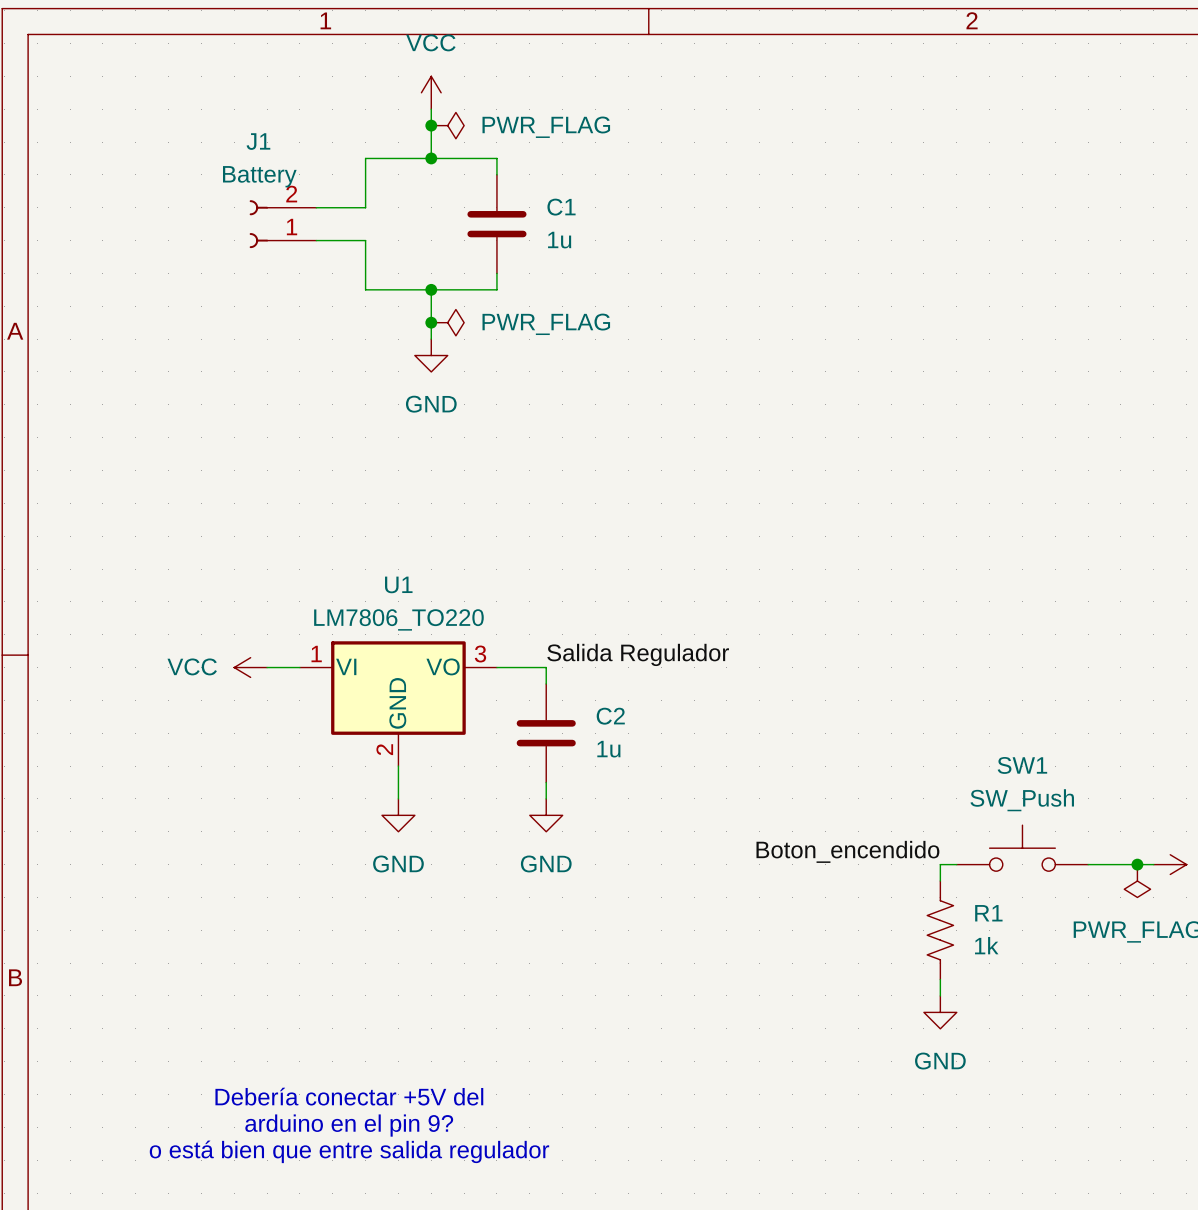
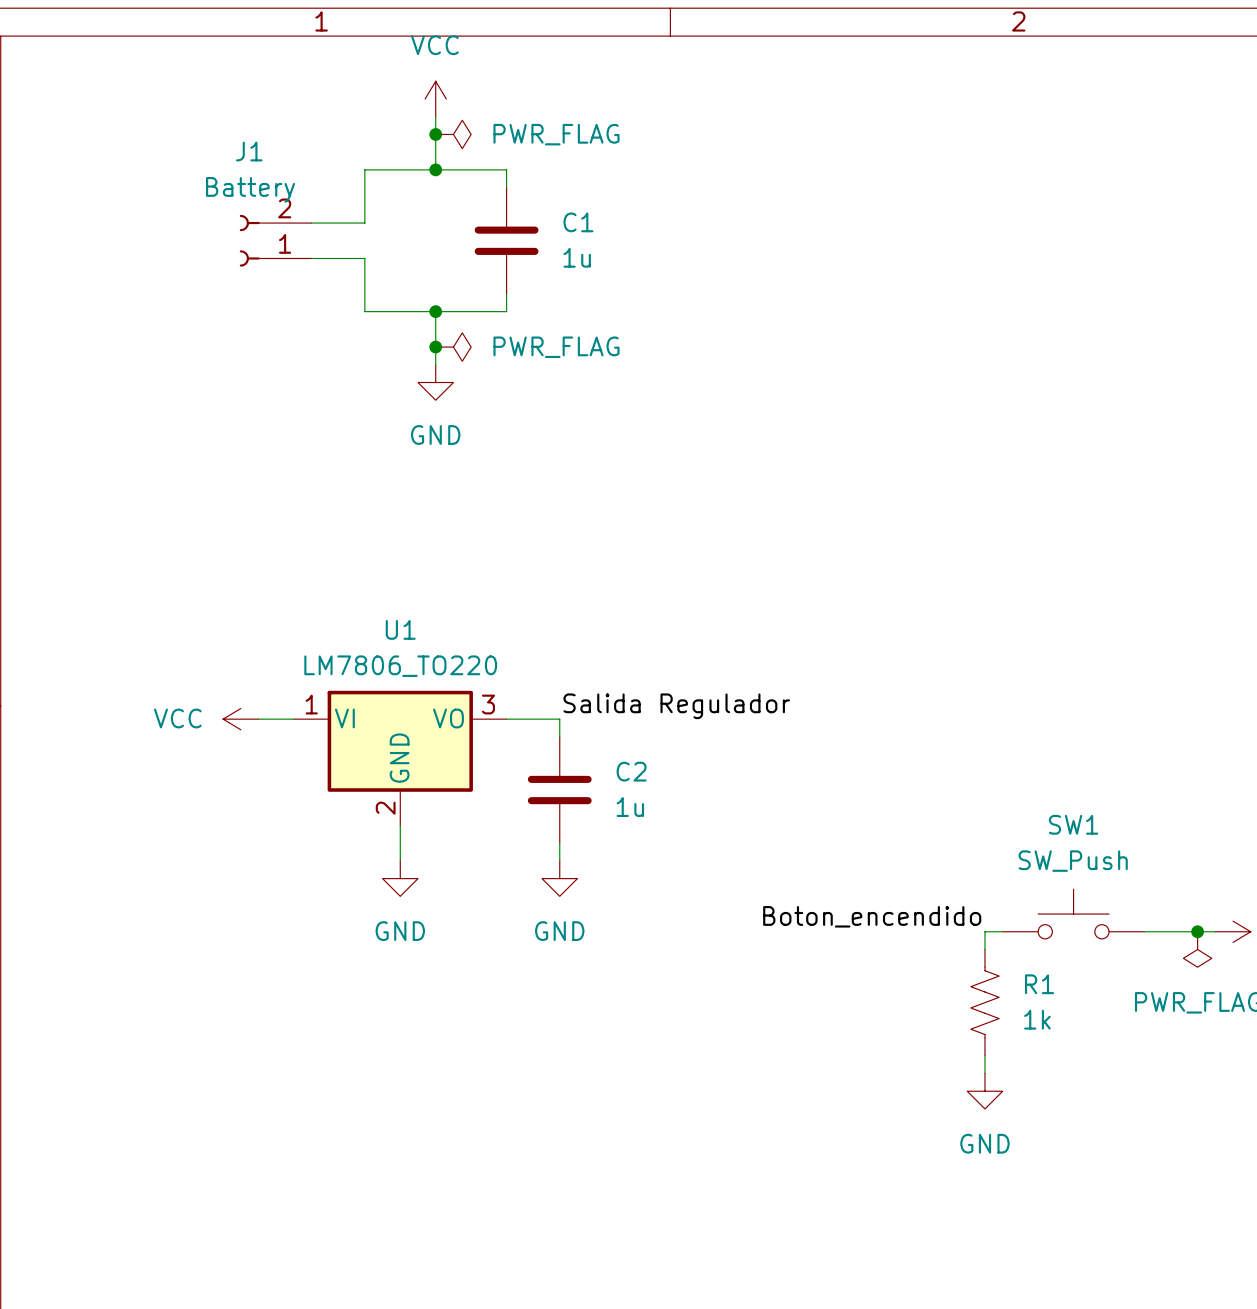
text: Debería conectar +5V del (349, 1096) -> none
text: arduino en el pin 9? (349, 1125) -> none
text: o está bien que entre salida regulador (349, 1151) -> none

